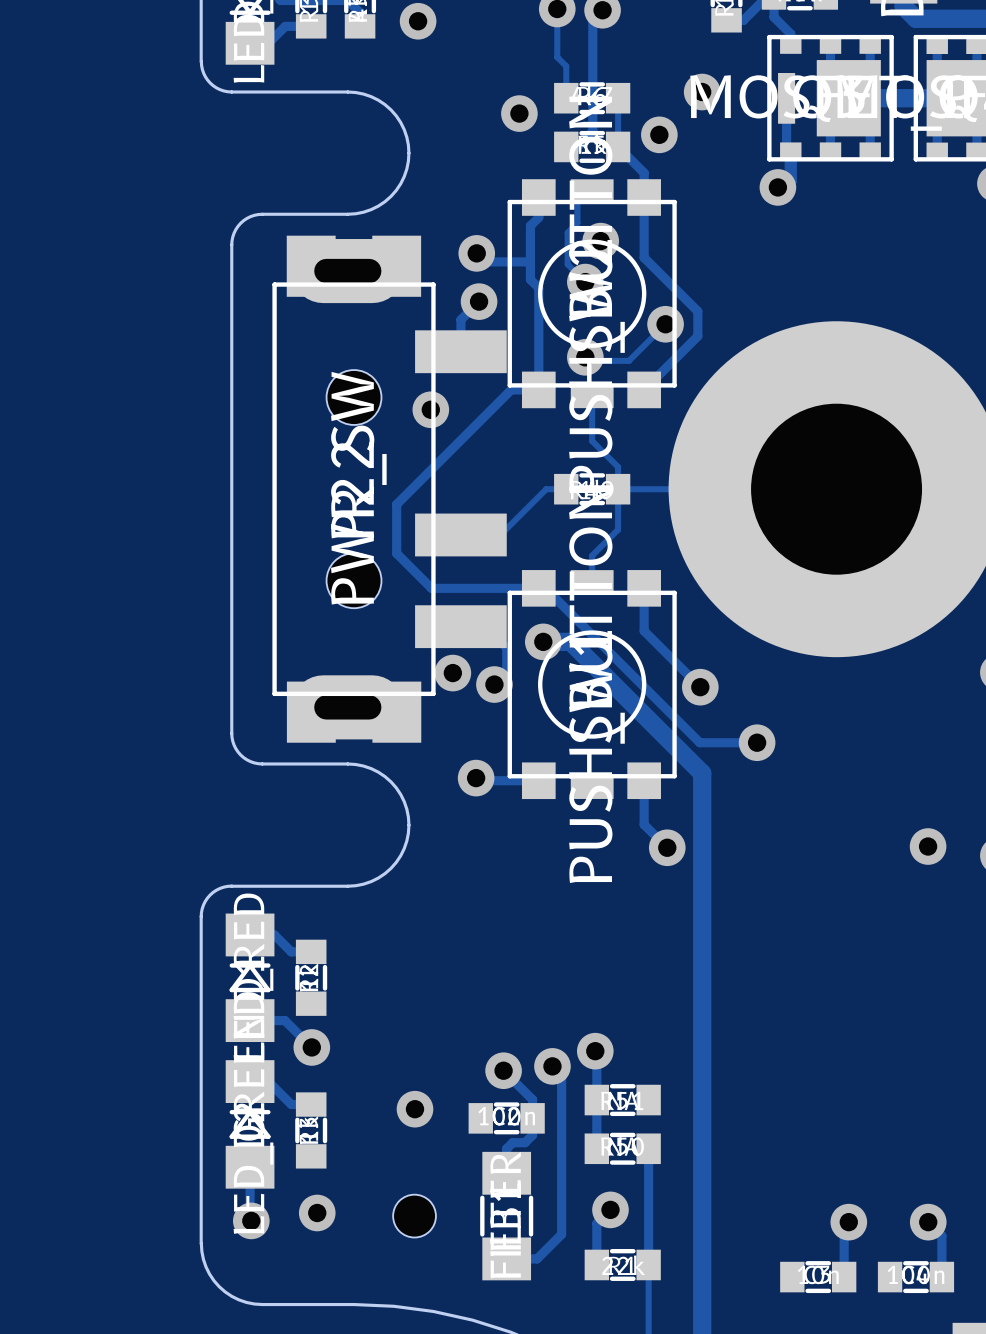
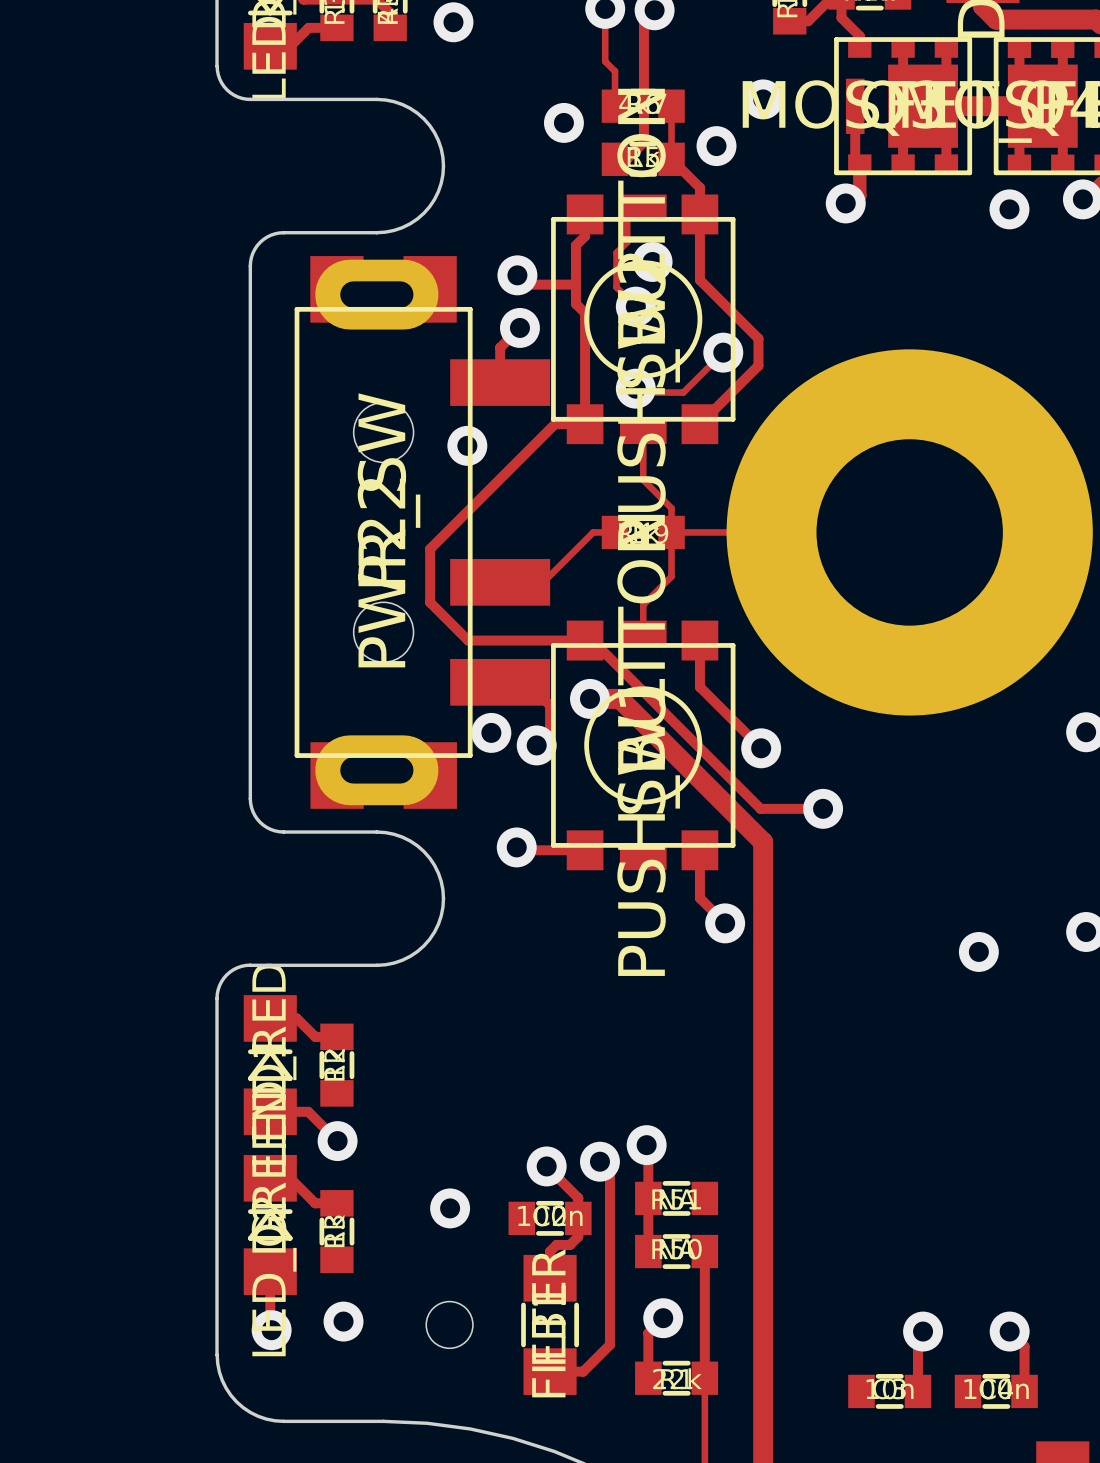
via: none -> (1009, 209)
via position: (928, 846) -> (978, 951)

